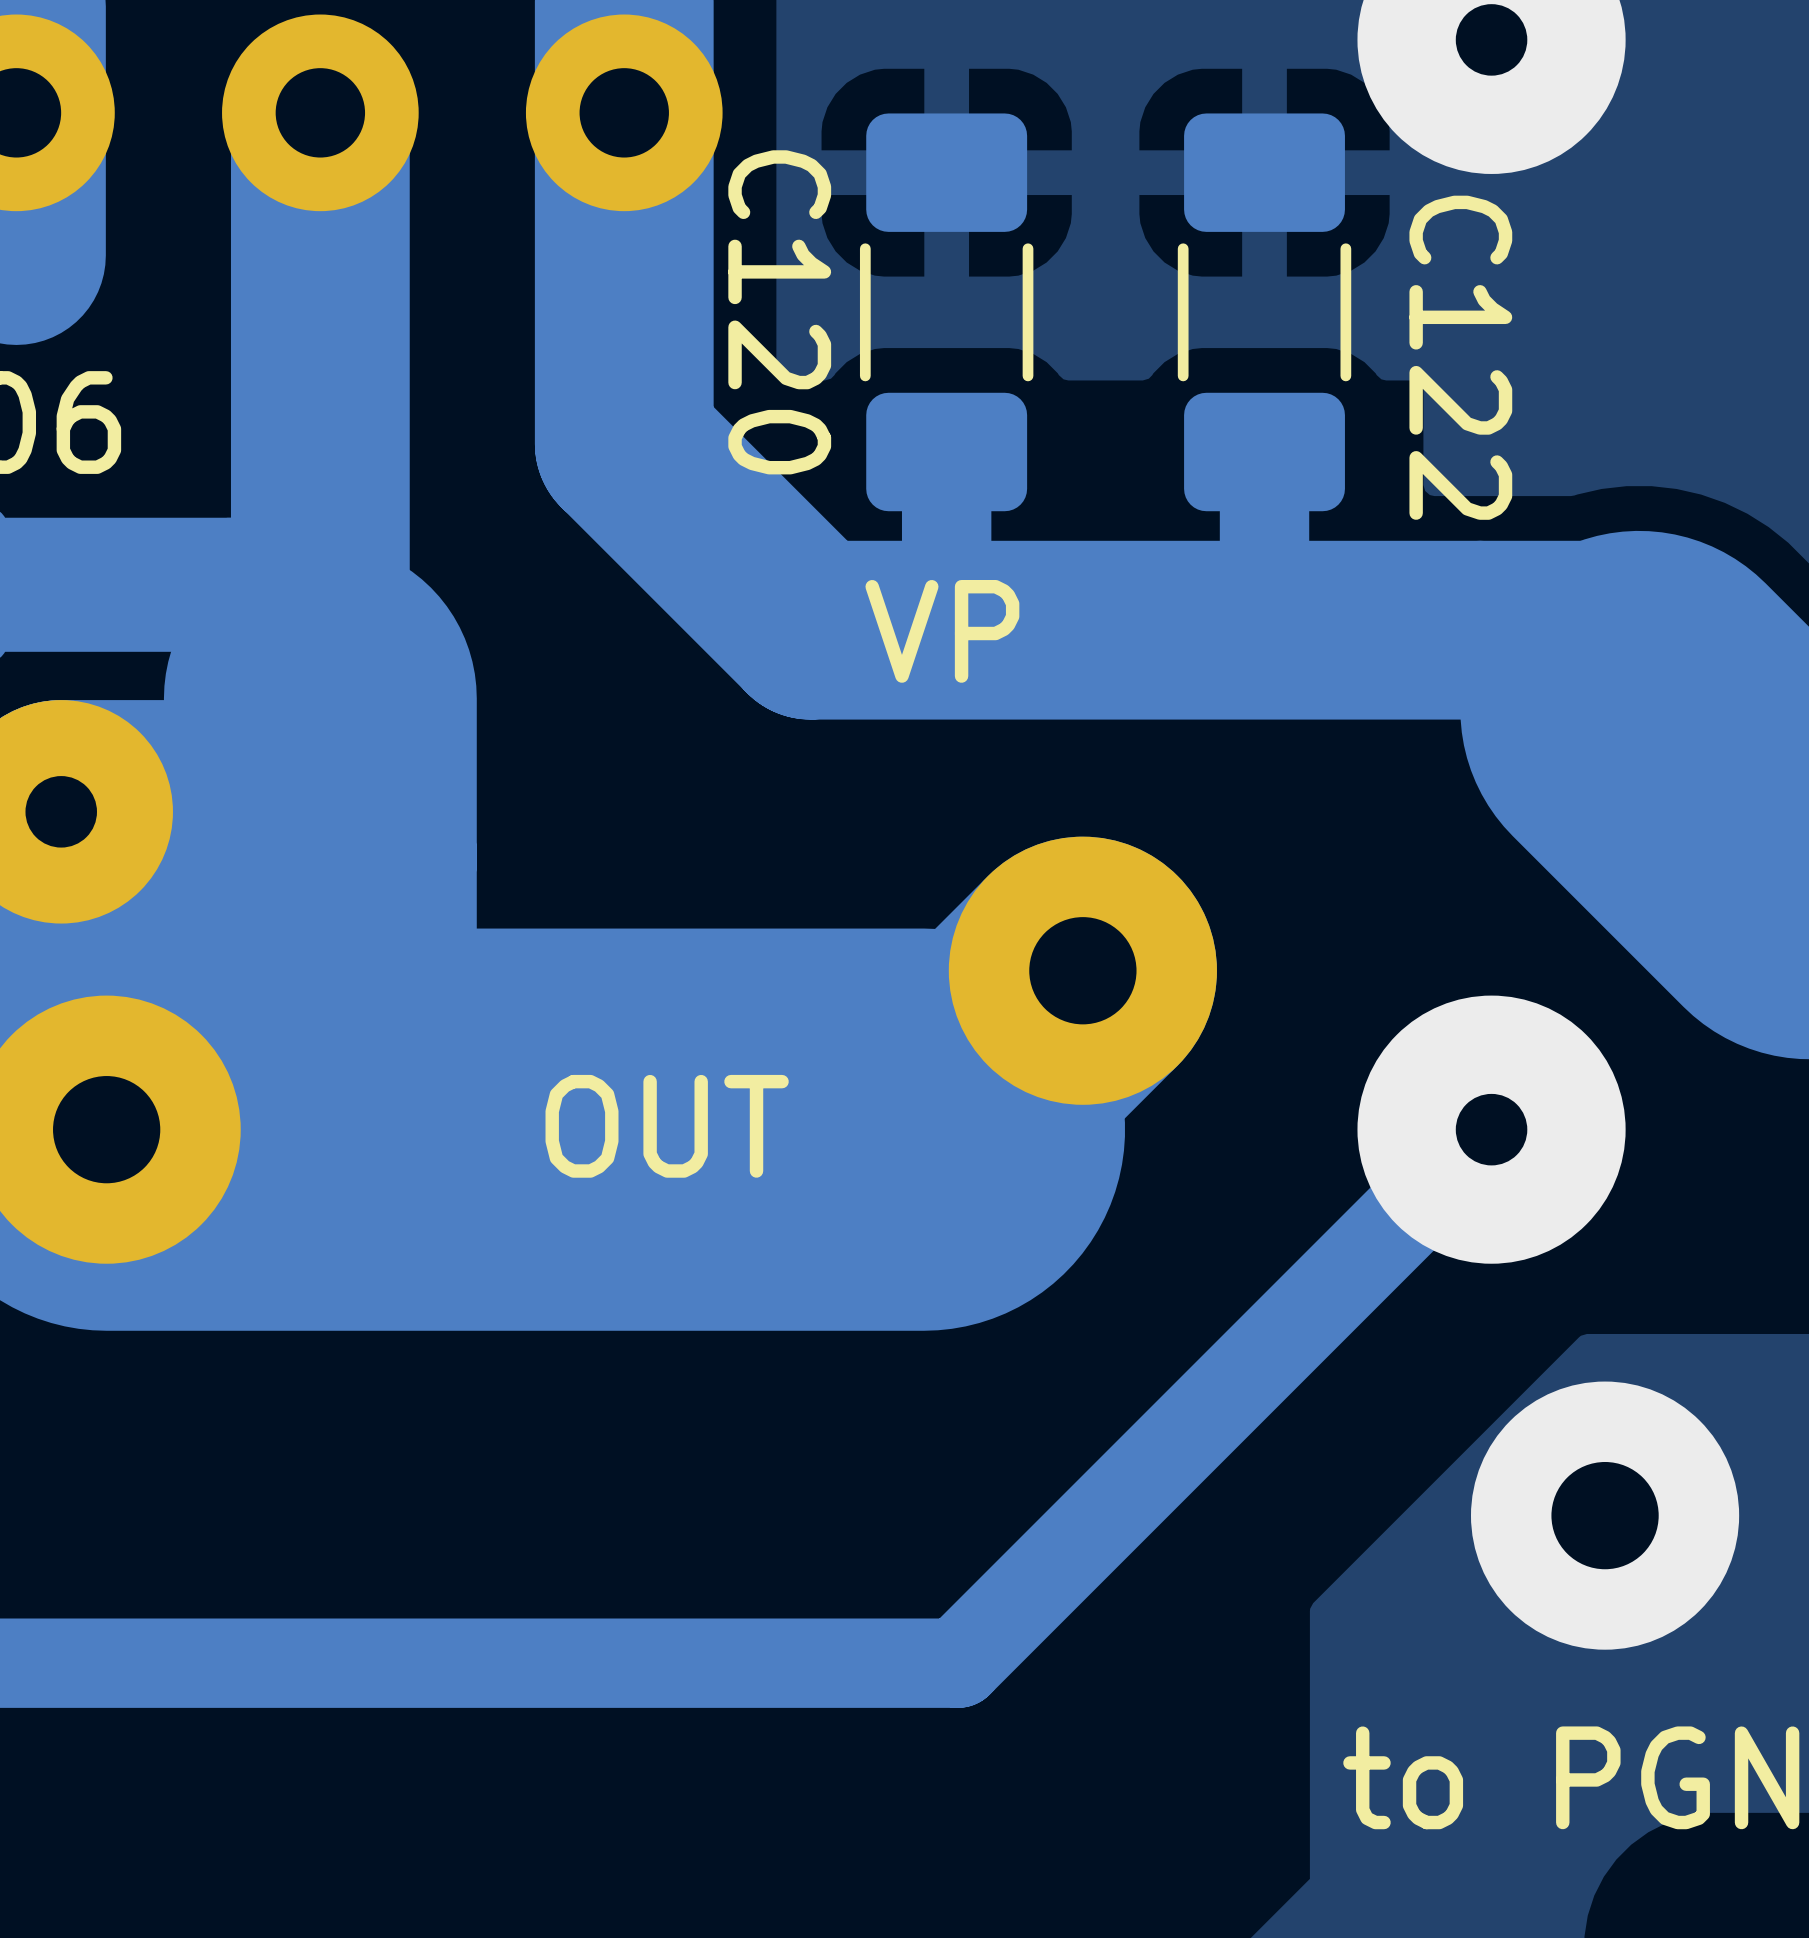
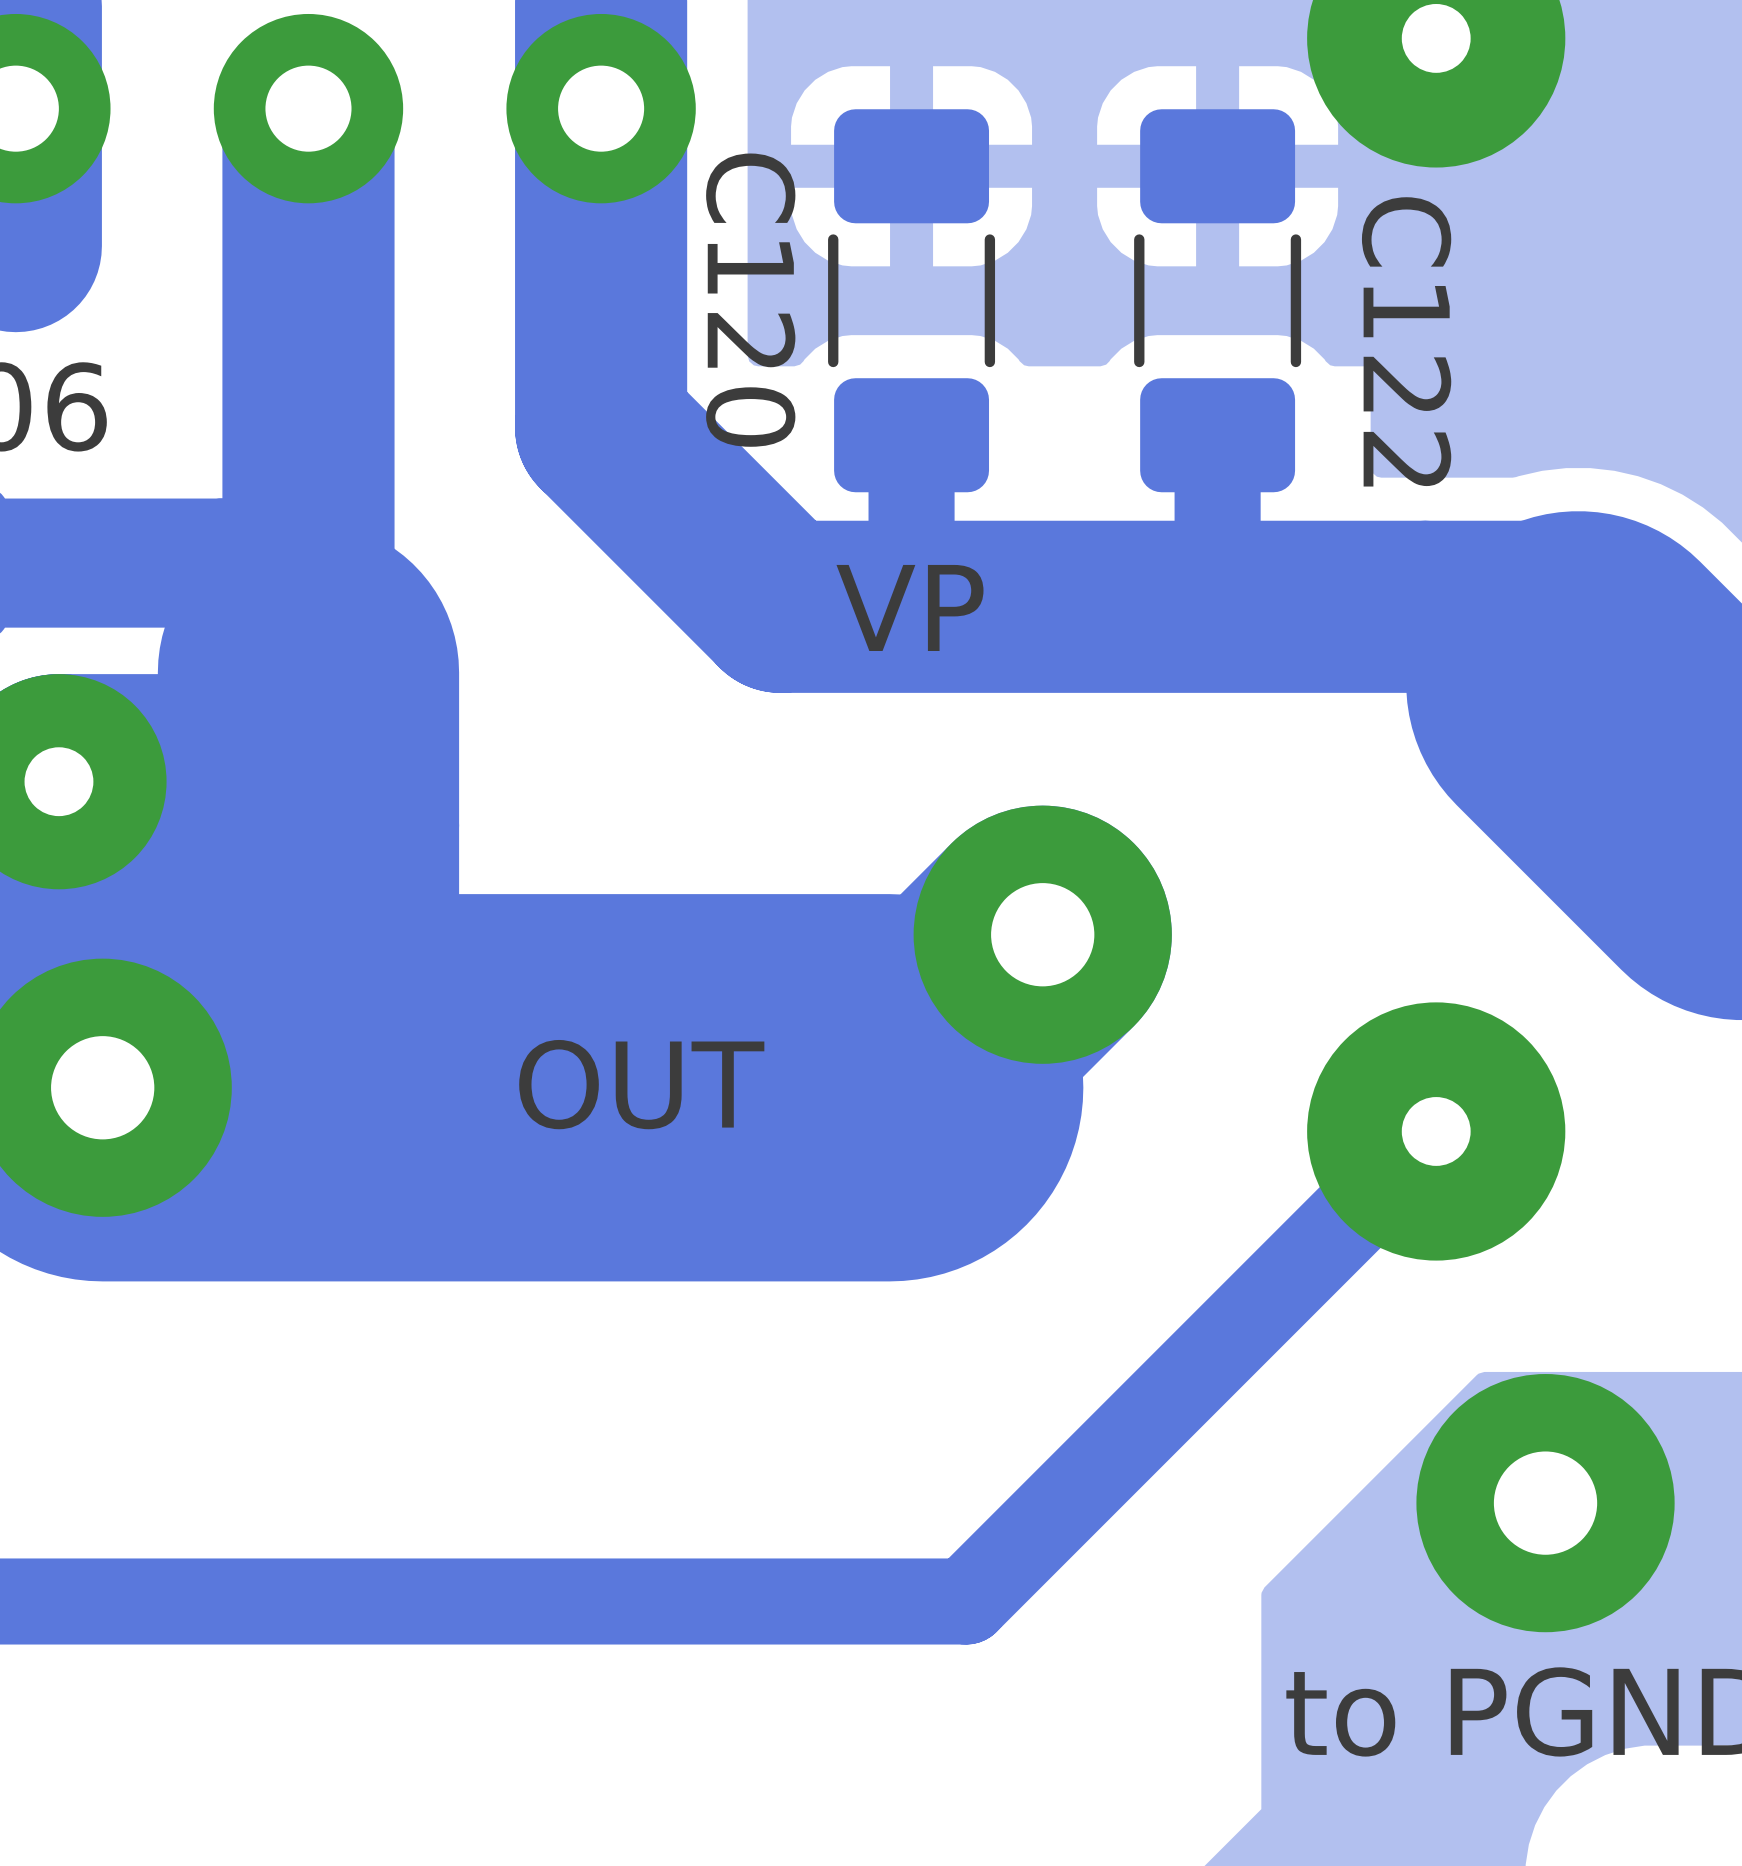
track: (1491, 1129) (958, 1663) -> (1436, 1131) (966, 1601) (922, 1601)
via position: (1491, 1129) -> (1436, 1131)
via position: (1605, 1515) -> (1545, 1503)

